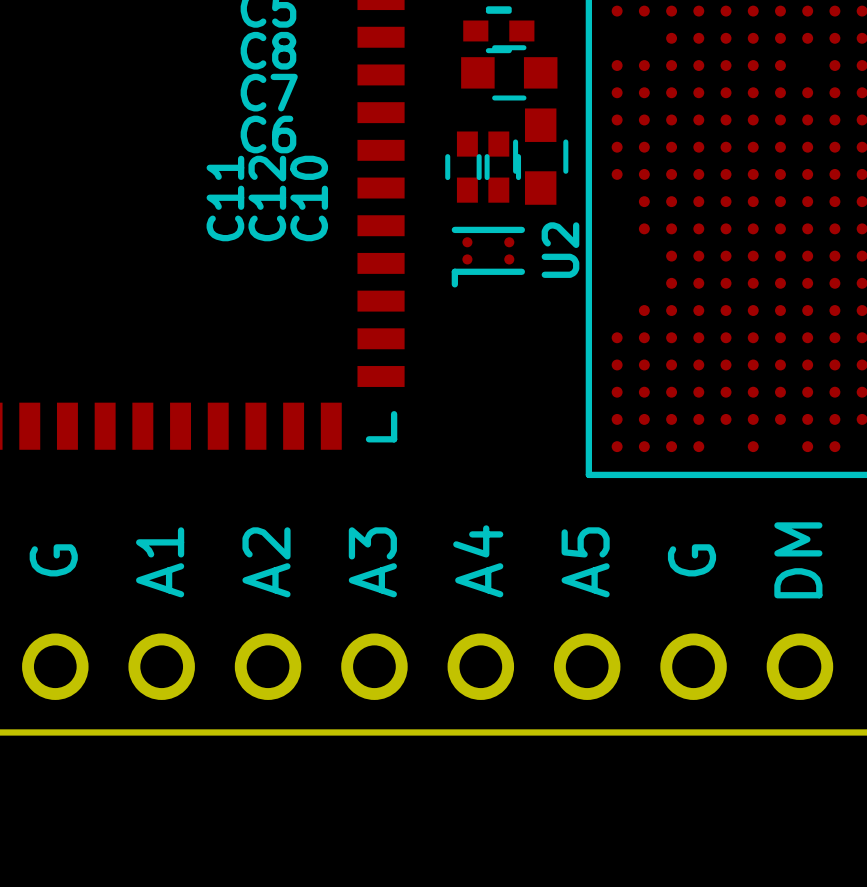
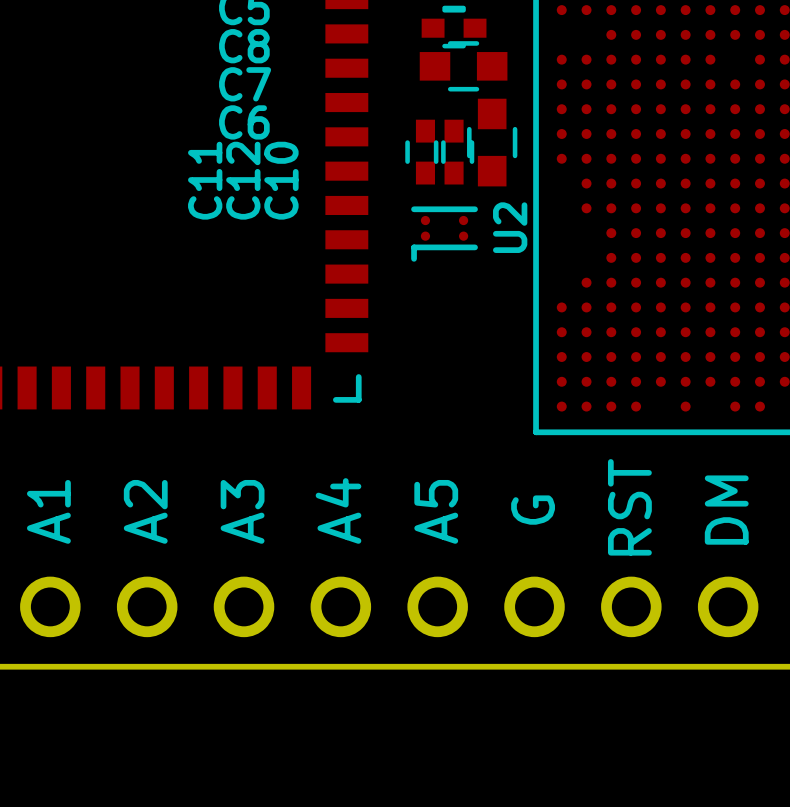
part value: G (53, 560) -> A1 (48, 511)
part value: G (692, 560) -> RST (629, 507)
part value: A4 (478, 561) -> A5 (436, 511)
part value: A1 (160, 562) -> A2 (145, 511)
part value: A2 (266, 562) -> A3 (242, 511)
part value: A3 (372, 562) -> A4 (338, 510)
part value: A5 (585, 562) -> G (533, 510)

